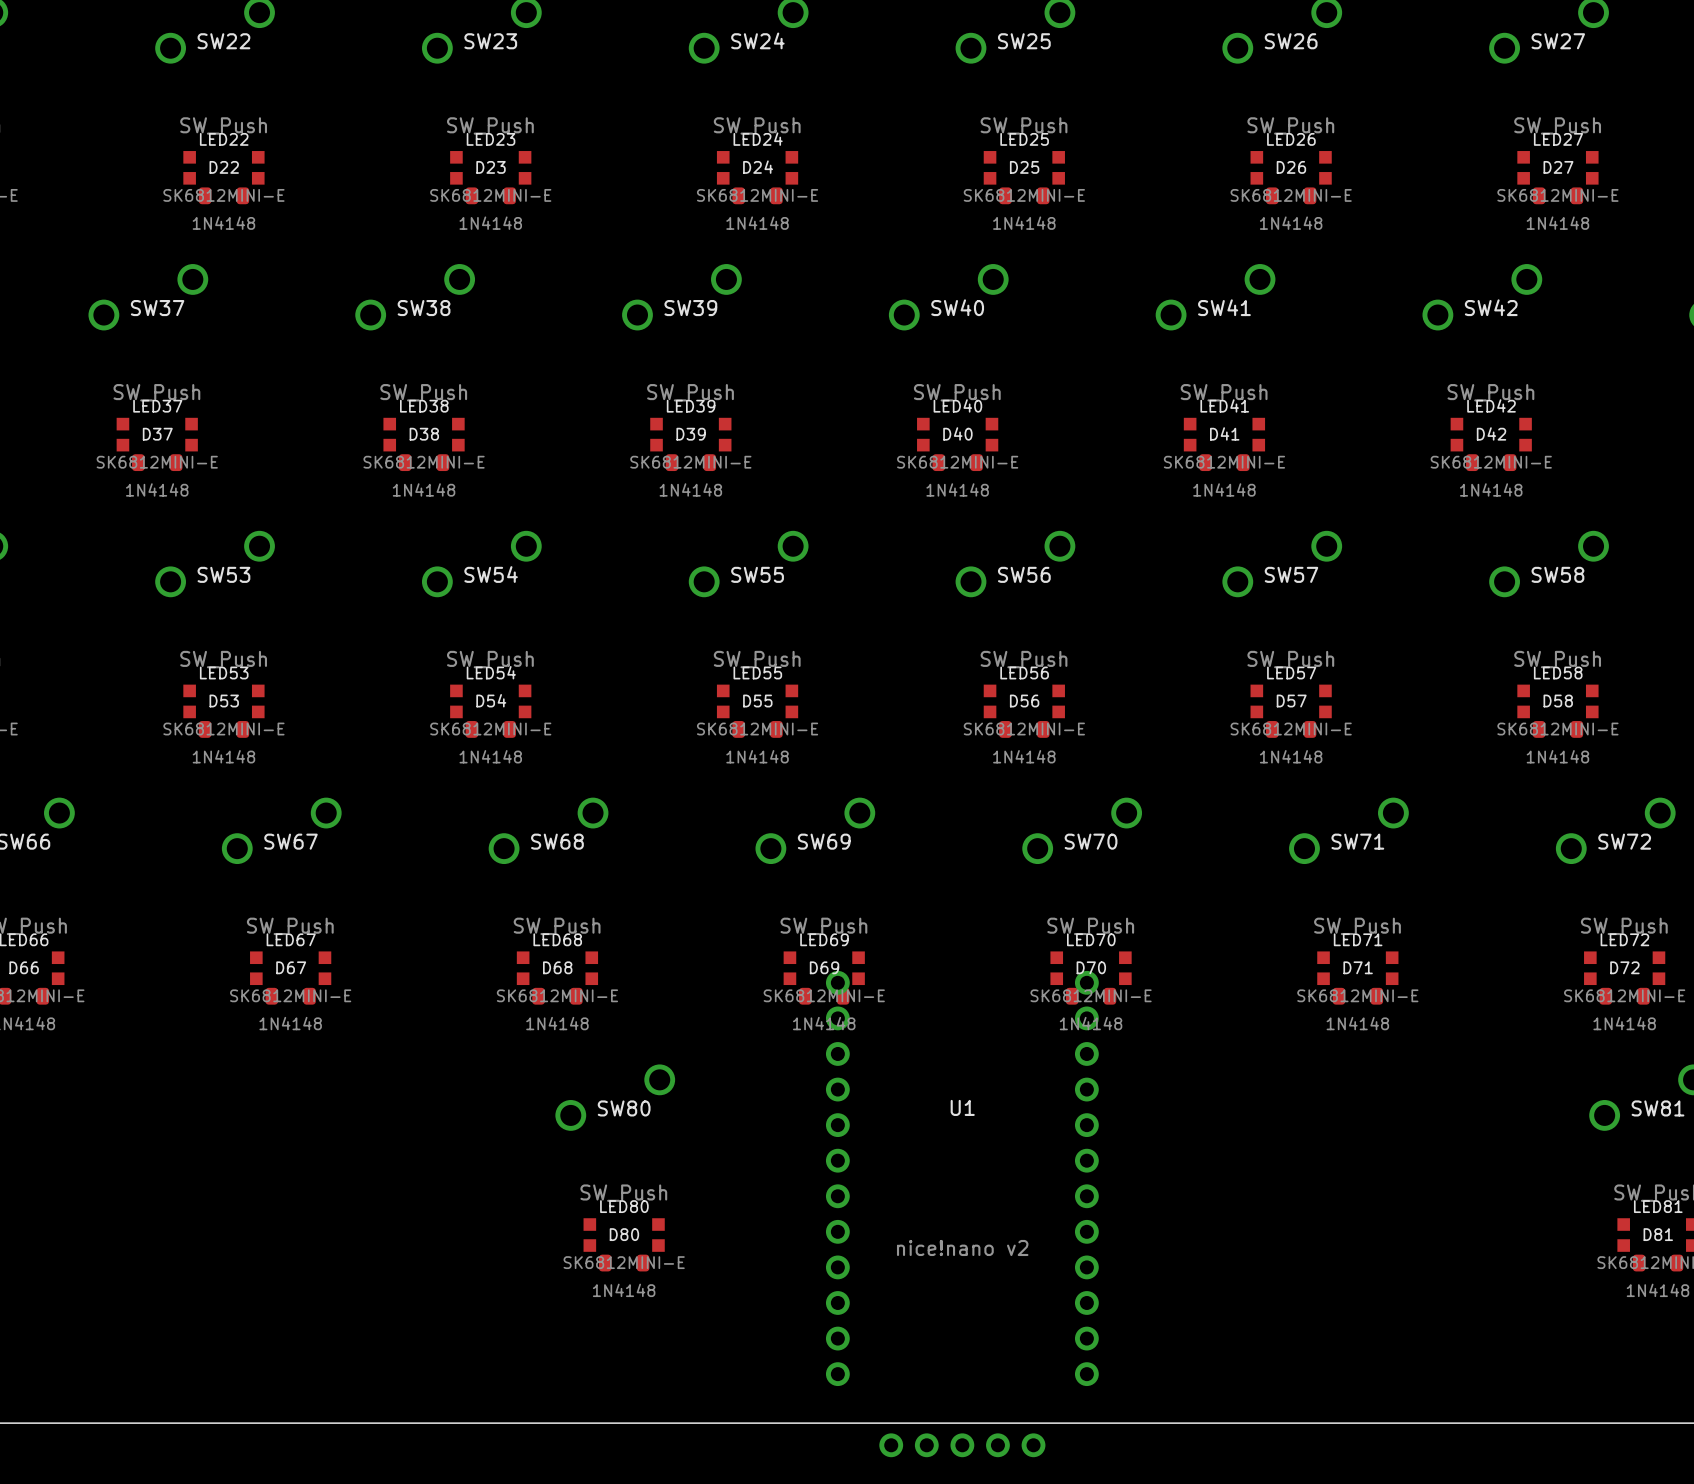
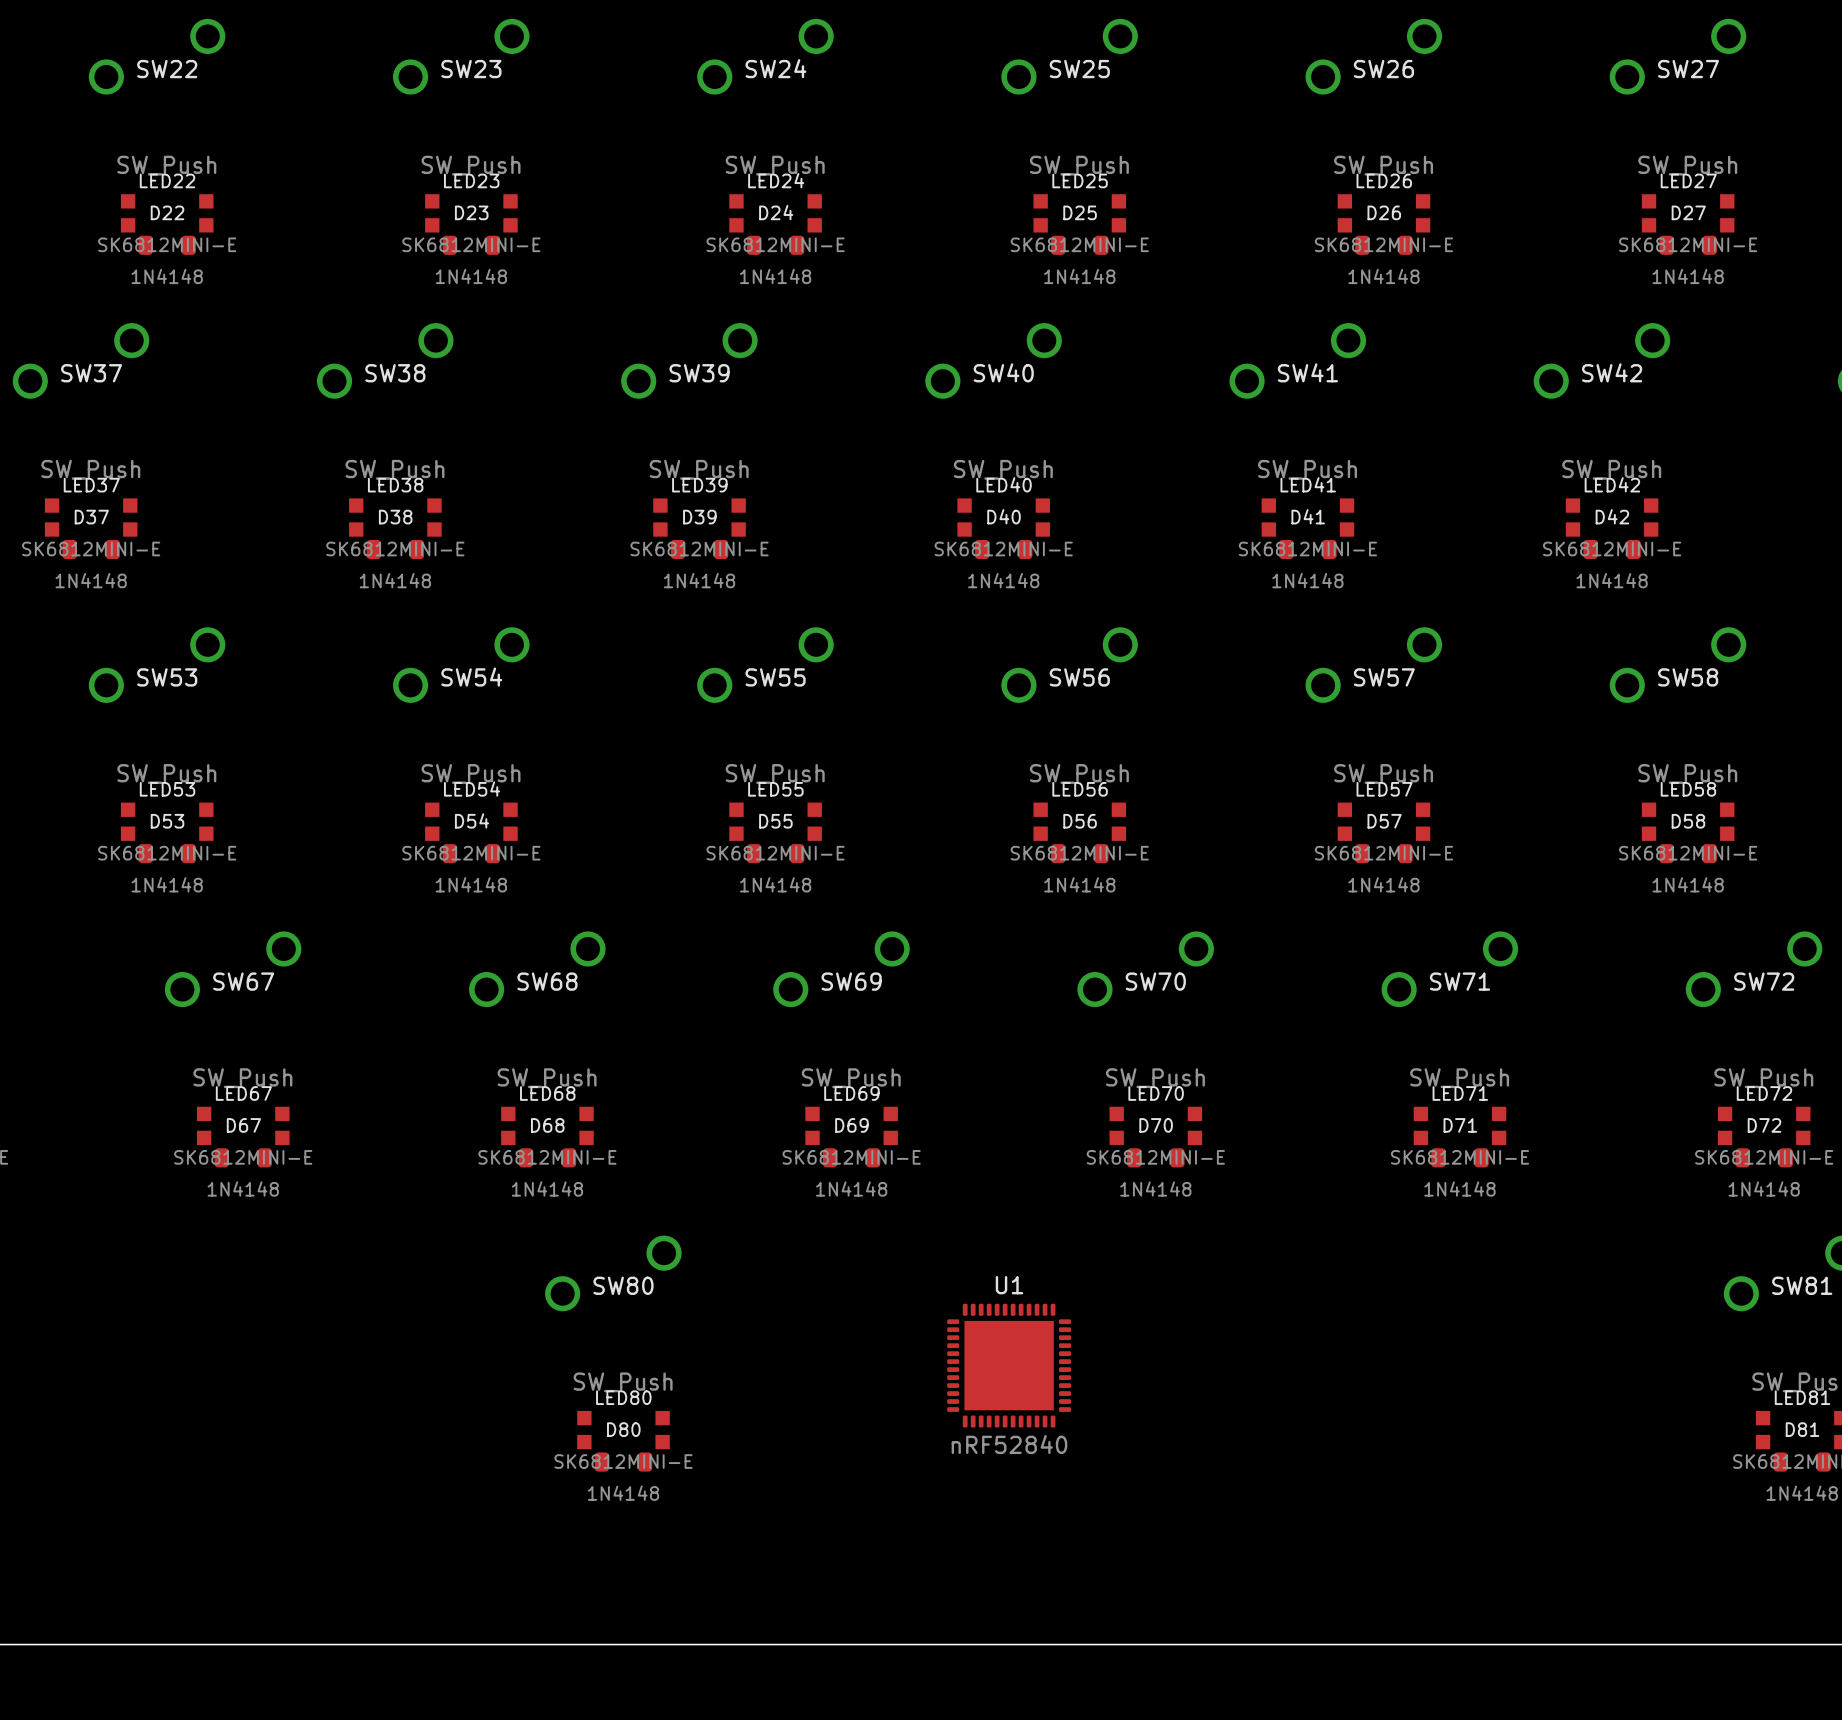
U1 footprint: [825, 970, 1099, 1458] -> [947, 1303, 1071, 1428]
U1 value: nice!nano v2 (962, 1247) -> nRF52840 (1009, 1444)

